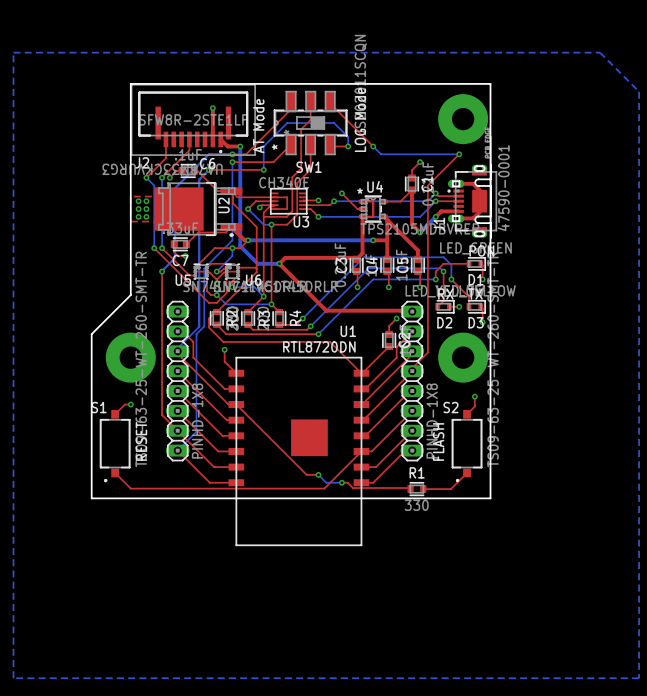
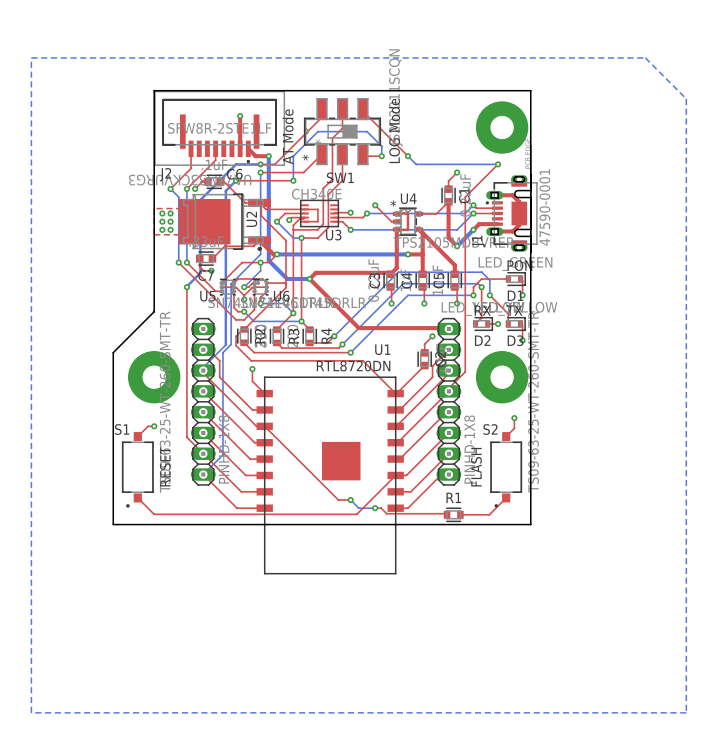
R1 value: 330 (416, 505) -> none

